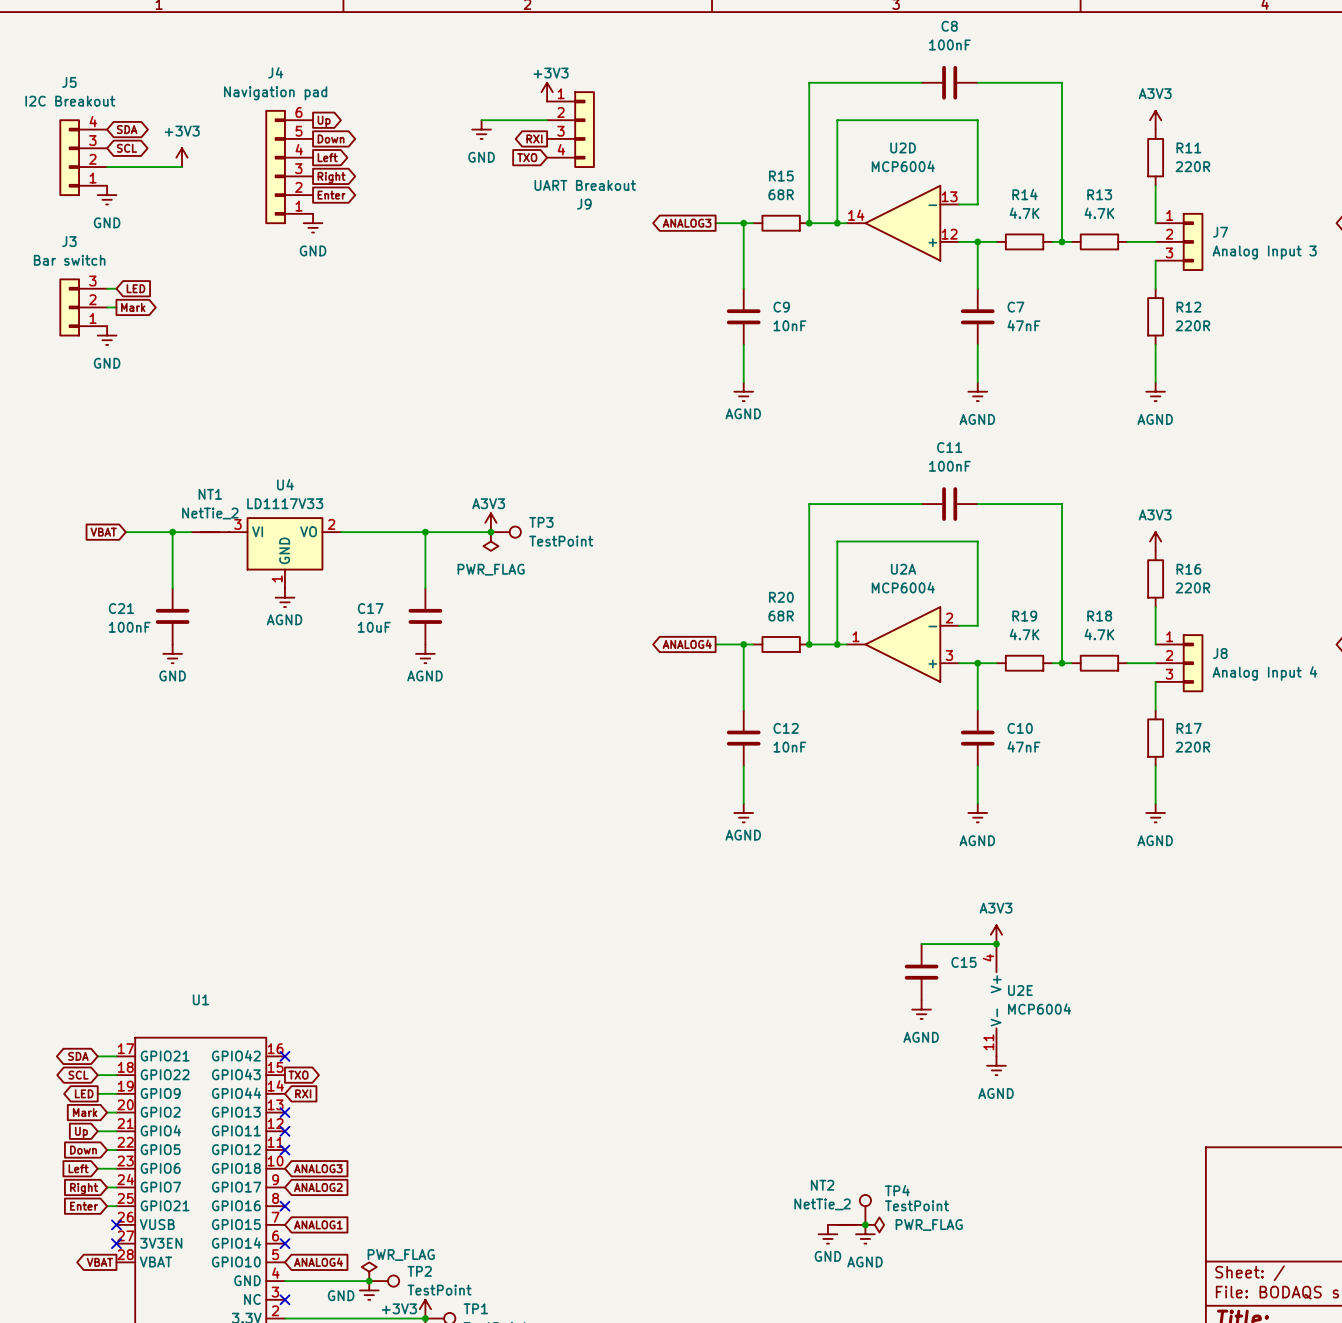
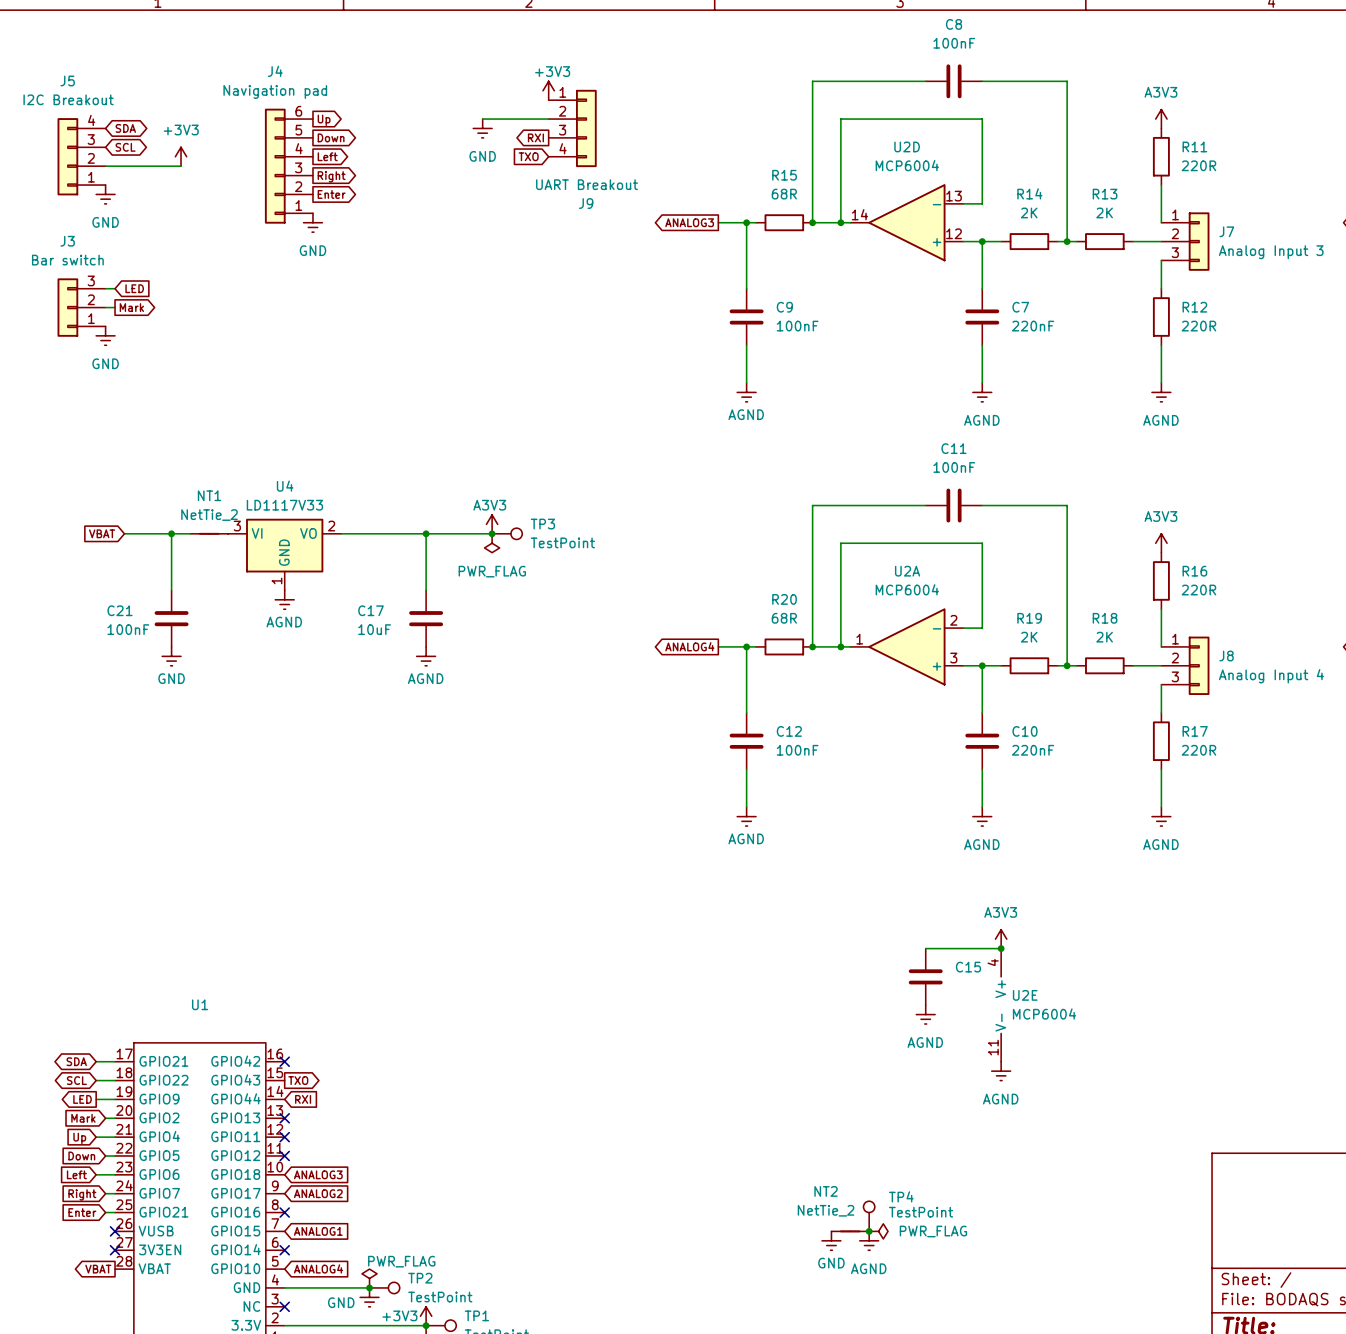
R14 value: 4.7K (1024, 213) -> 2K (1029, 212)
R13 value: 4.7K (1099, 213) -> 2K (1104, 212)
C9 value: 10nF (789, 325) -> 100nF (797, 326)
C7 value: 47nF (1023, 325) -> 220nF (1033, 326)
R19 value: 4.7K (1024, 634) -> 2K (1029, 637)
R18 value: 4.7K (1099, 634) -> 2K (1104, 637)
C10 value: 47nF (1023, 746) -> 220nF (1033, 750)
C12 value: 10nF (789, 747) -> 100nF (797, 750)

